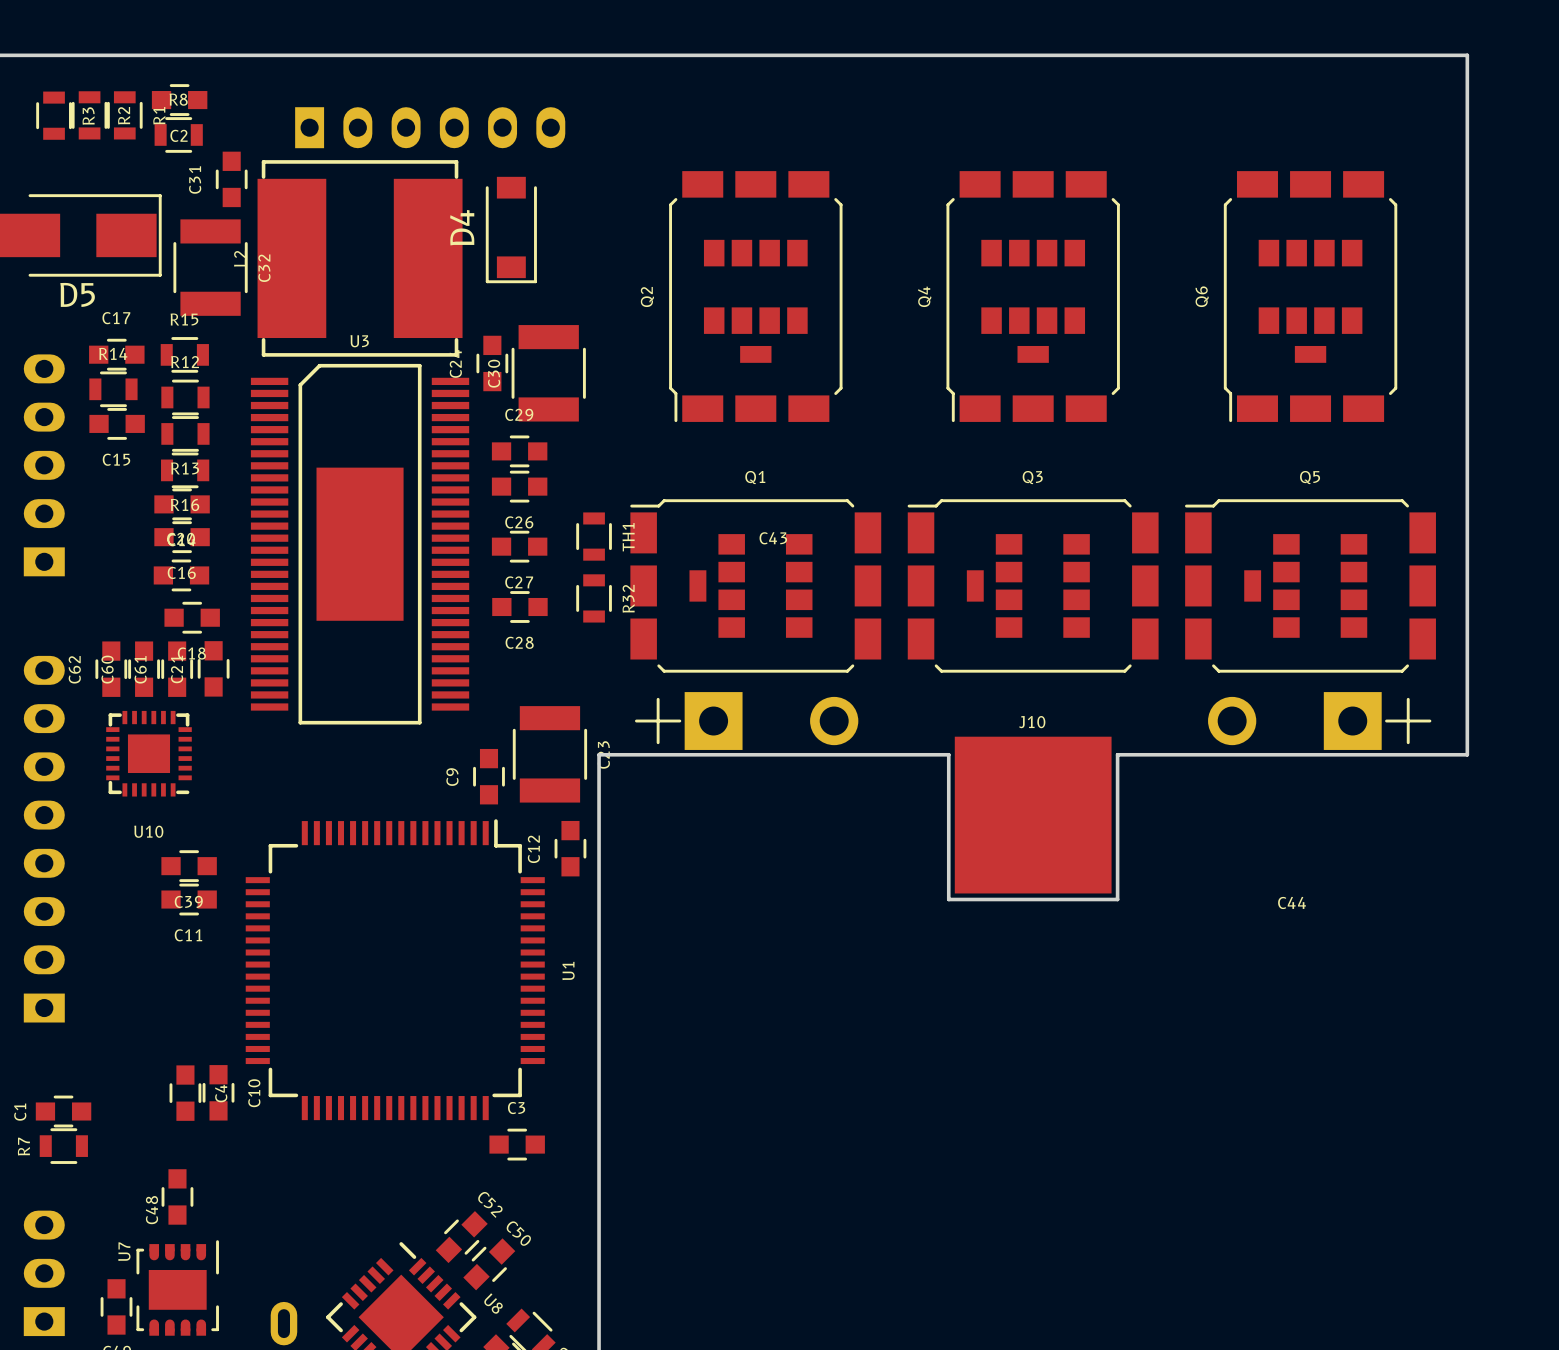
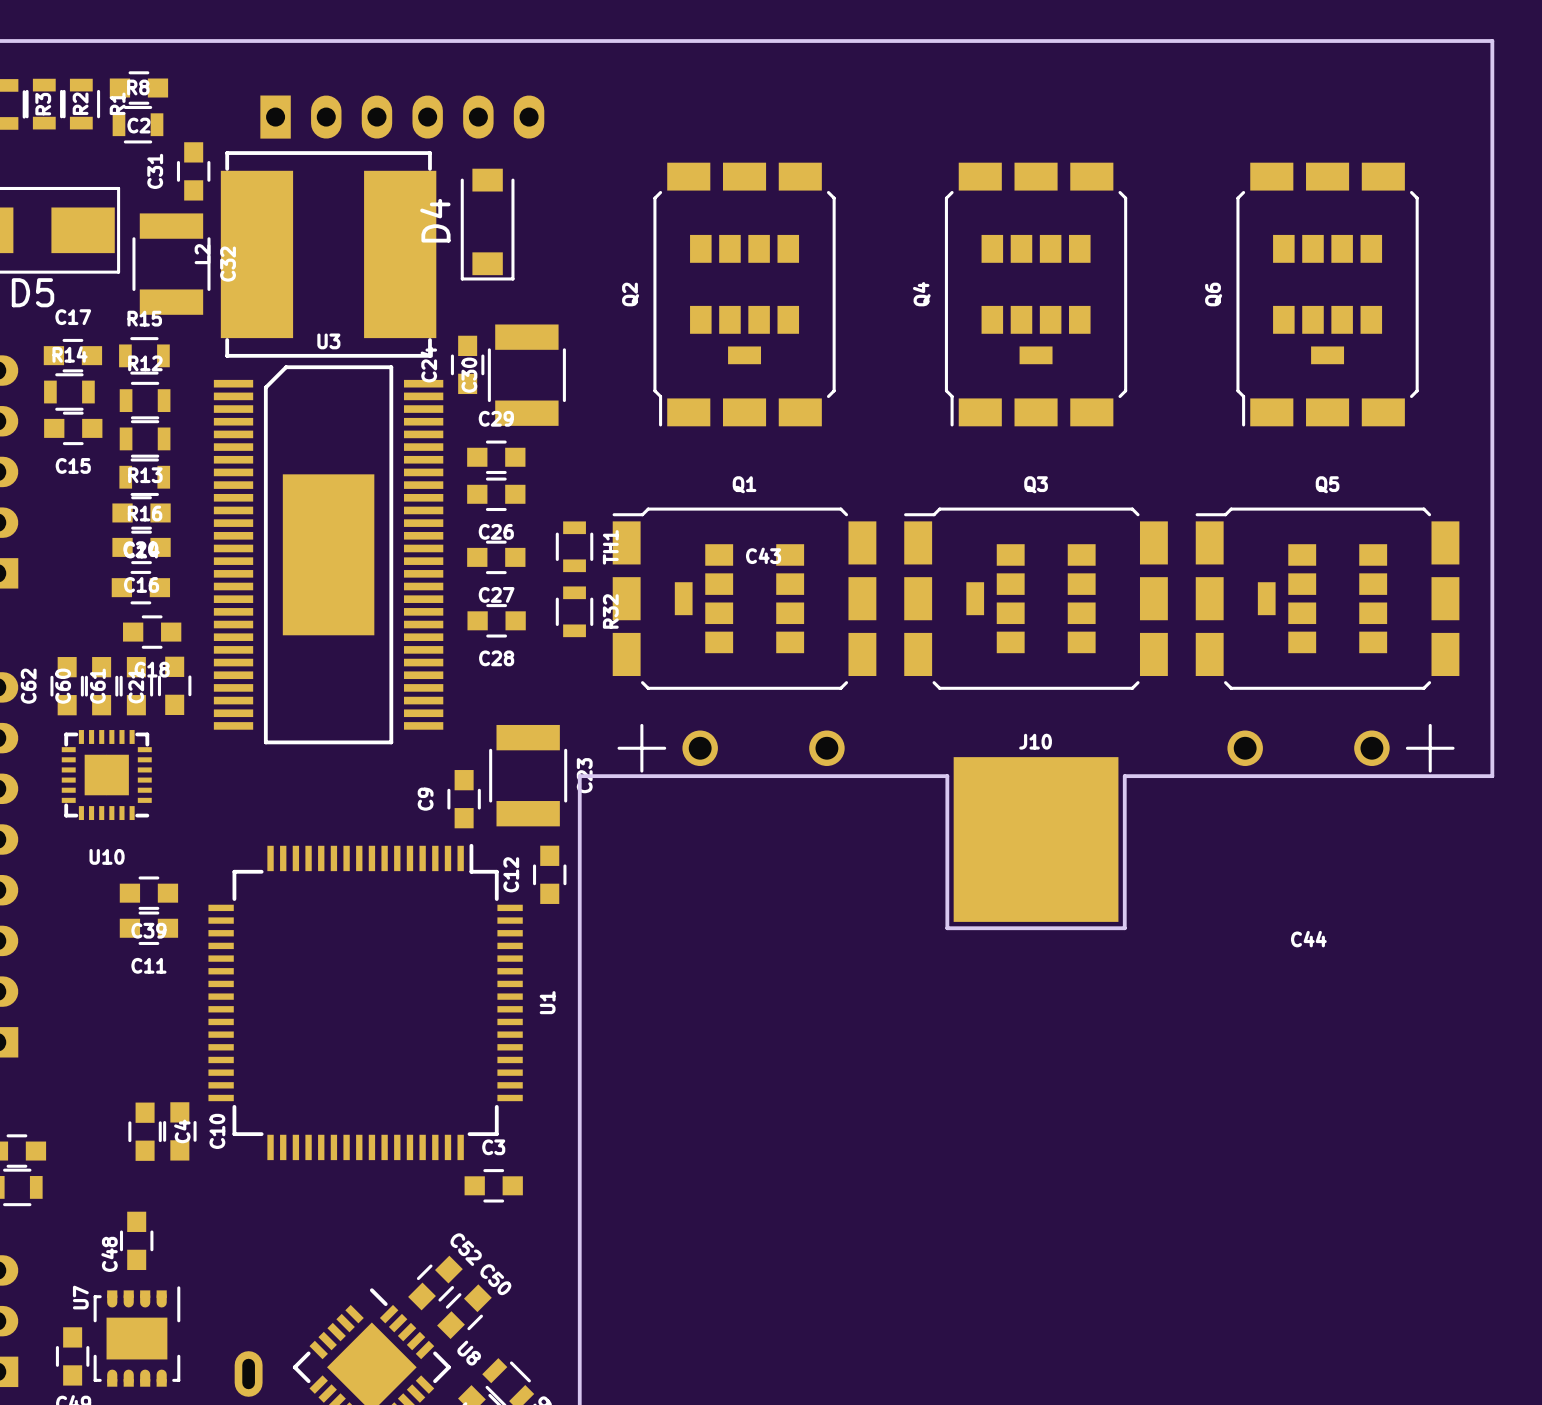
C43 footprint: [634, 692, 859, 750] -> [617, 723, 845, 773]
C44 footprint: [1208, 692, 1432, 750] -> [1227, 723, 1455, 773]

